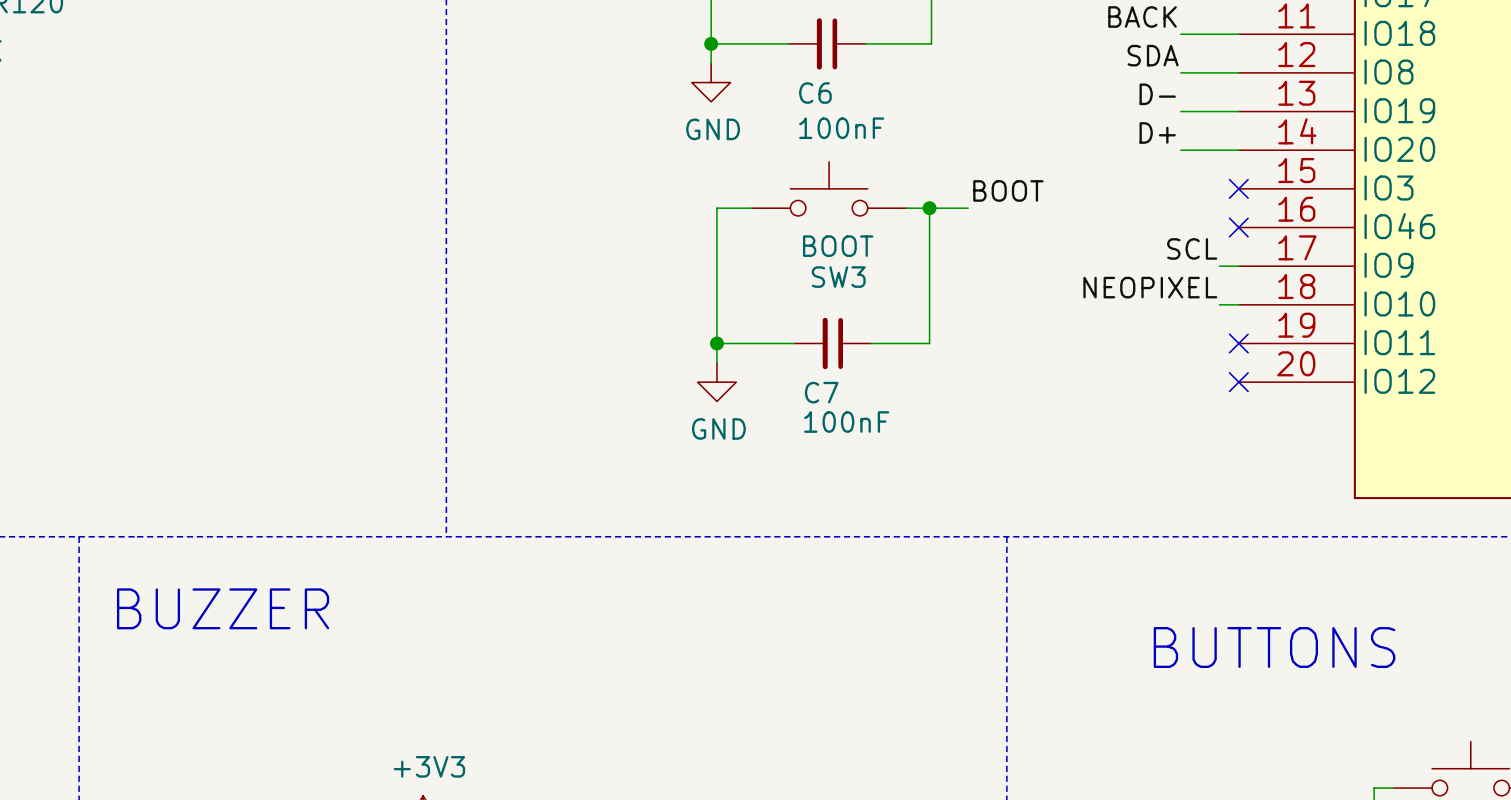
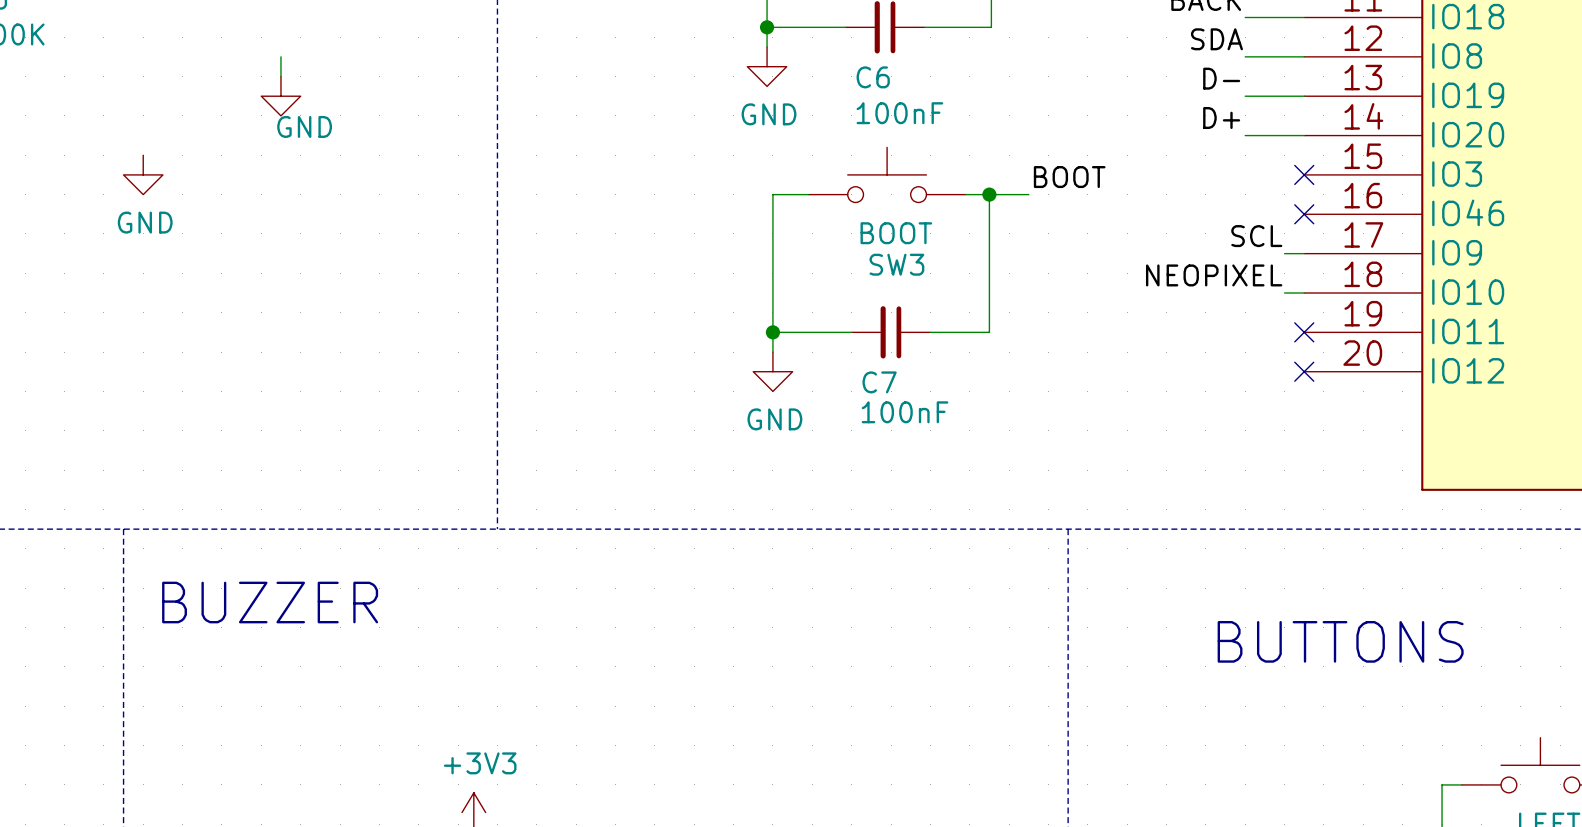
wire: none -> (280, 56) (280, 76)
power symbol: none -> GND (280, 96)
power symbol: none -> GND (143, 174)

